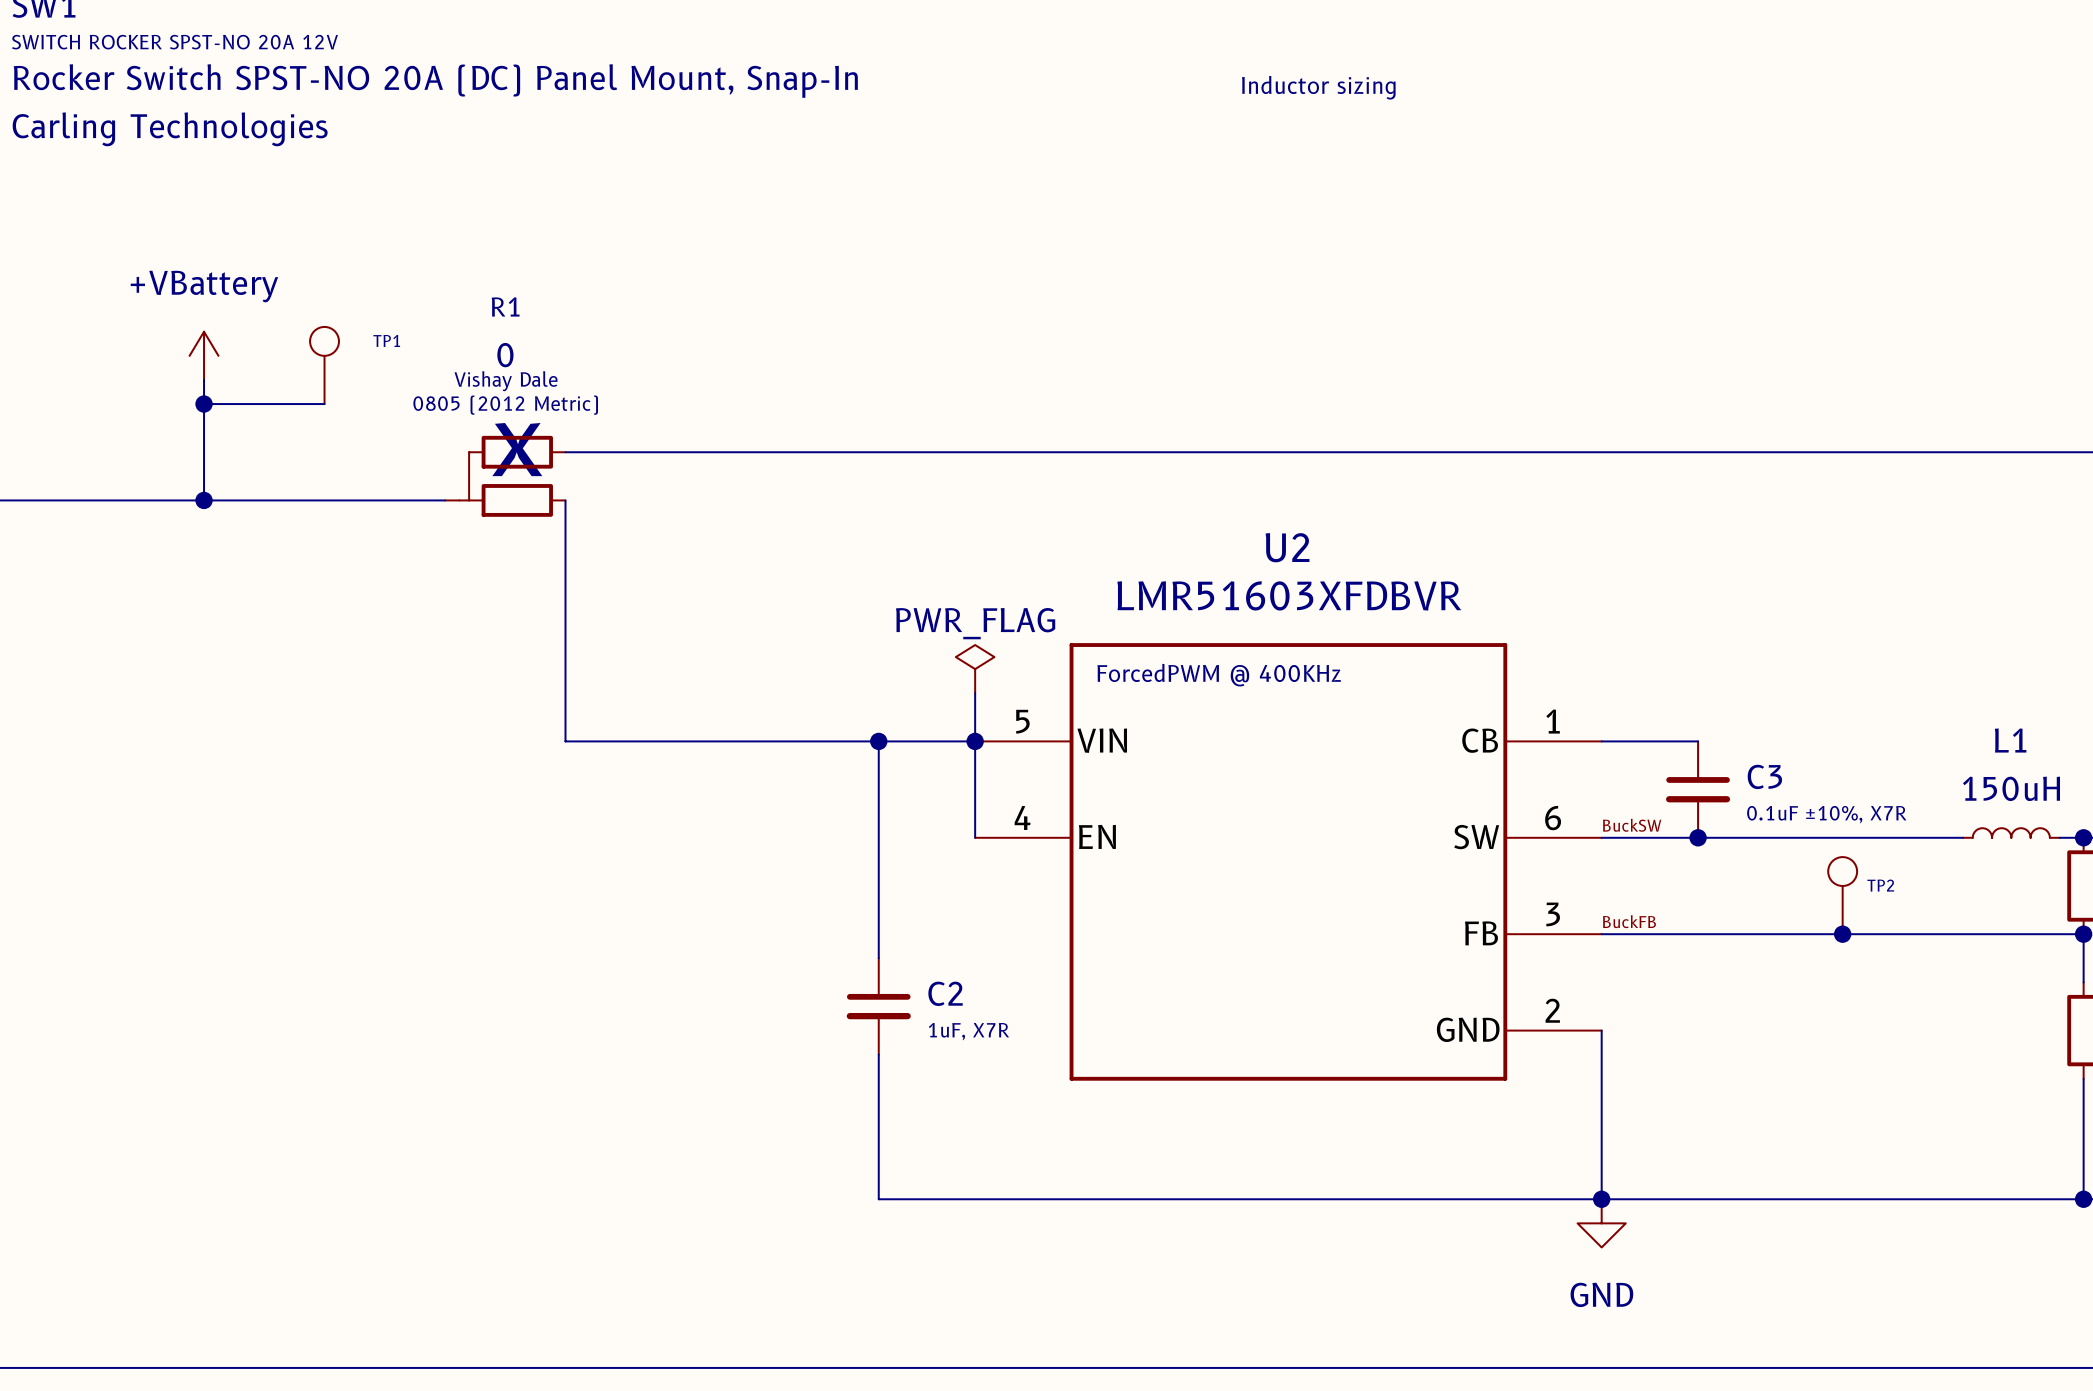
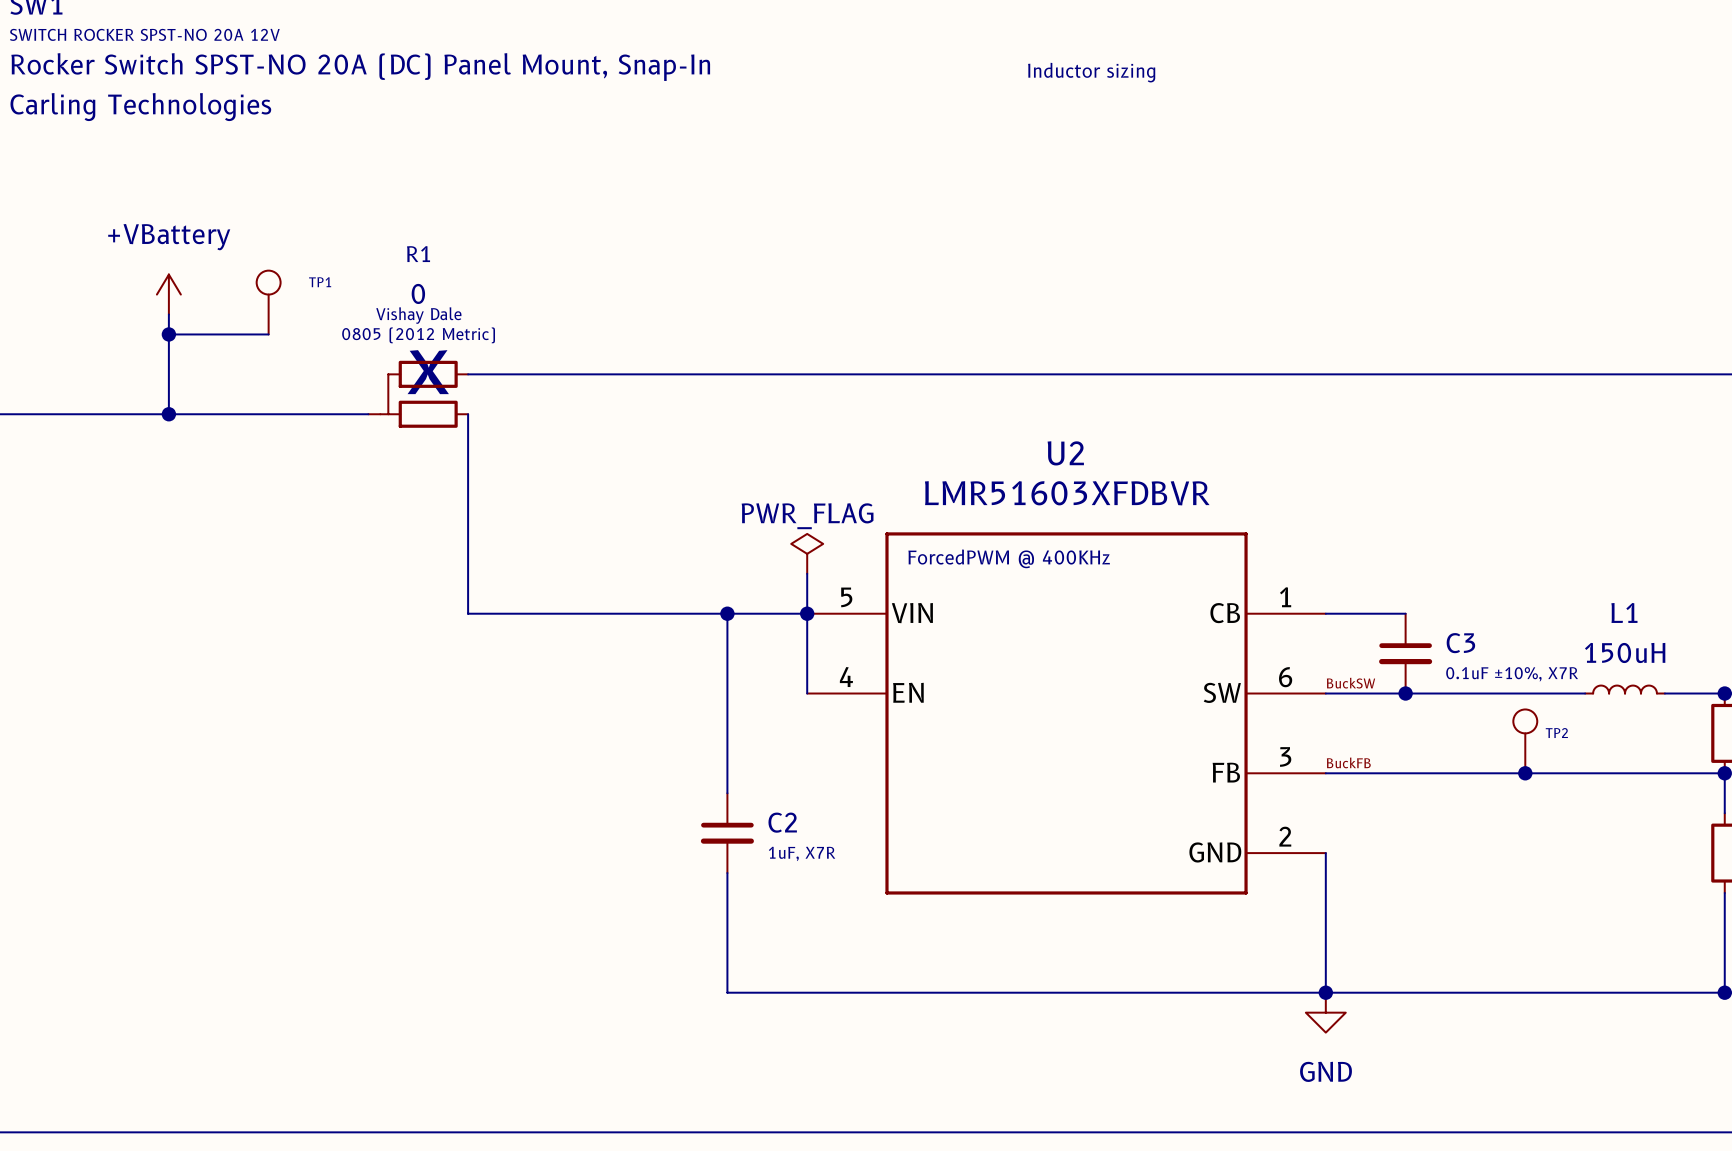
L1 position: (2011, 833) -> (1625, 689)
wire: (1914, 837) (1963, 837) -> (1664, 693) (1704, 693)

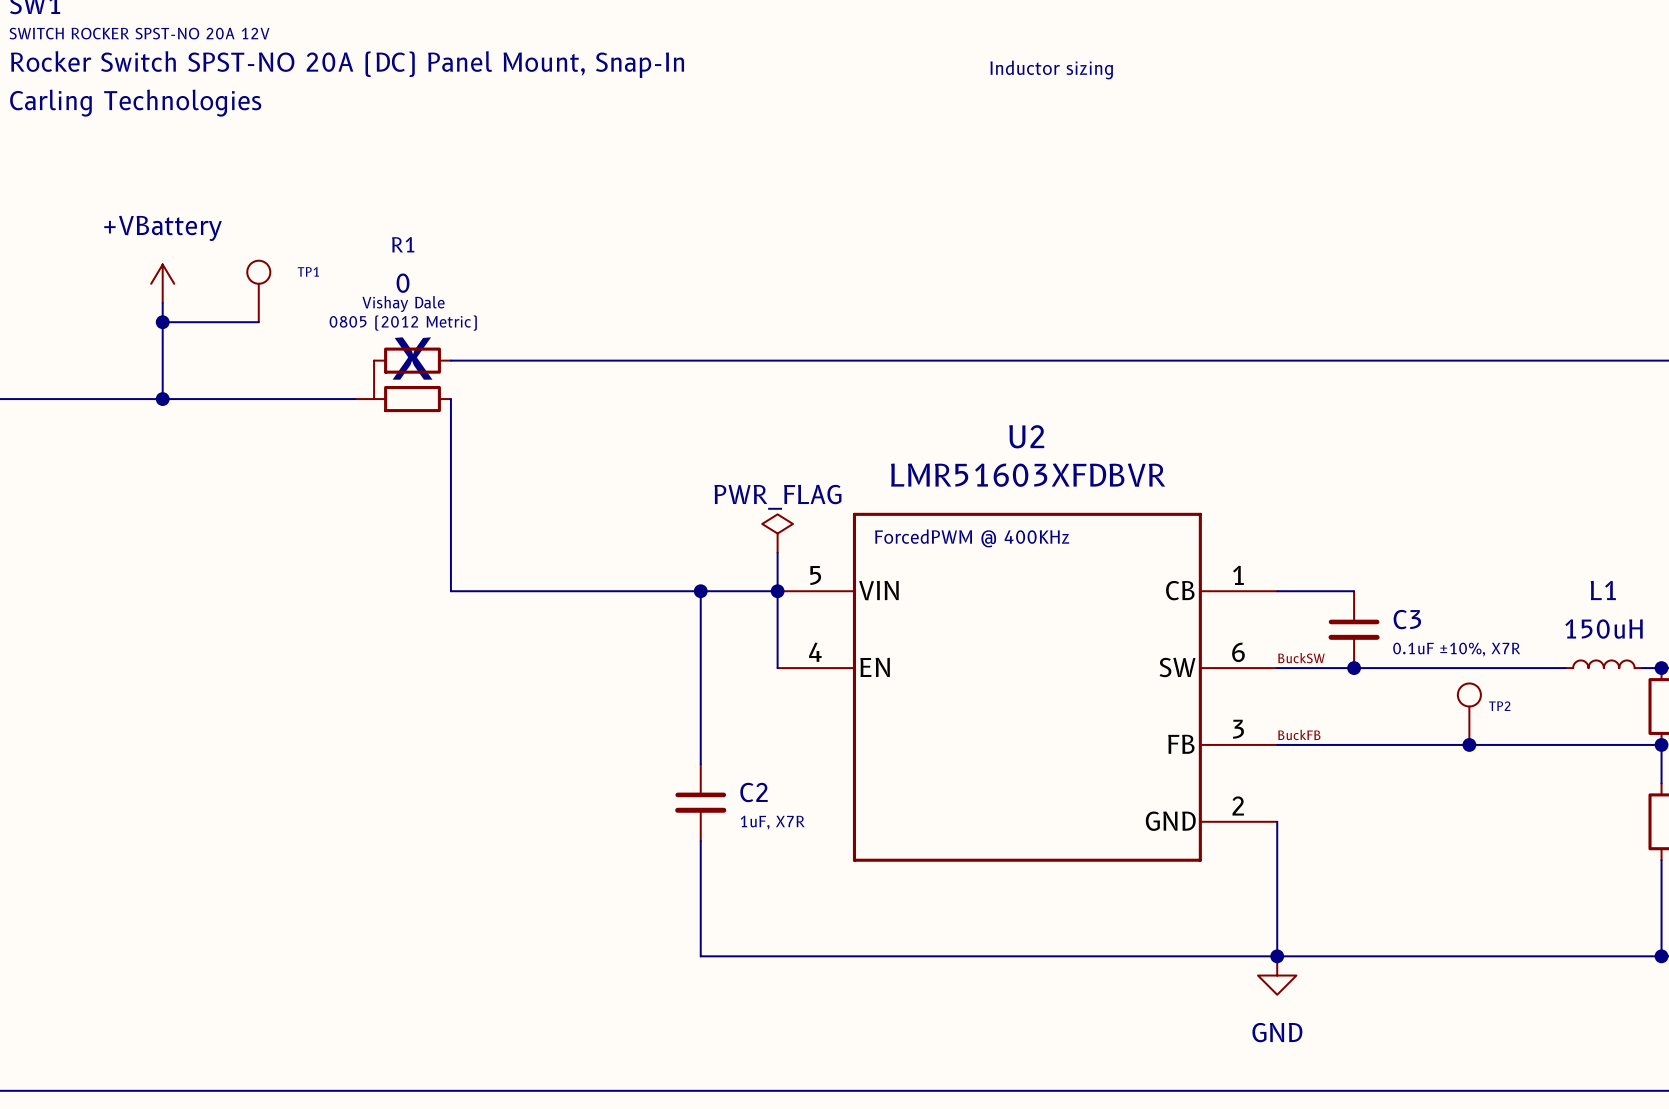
L1 position: (1625, 689) -> (1603, 664)
wire: (1664, 693) (1704, 693) -> (1527, 668) (1565, 668)

